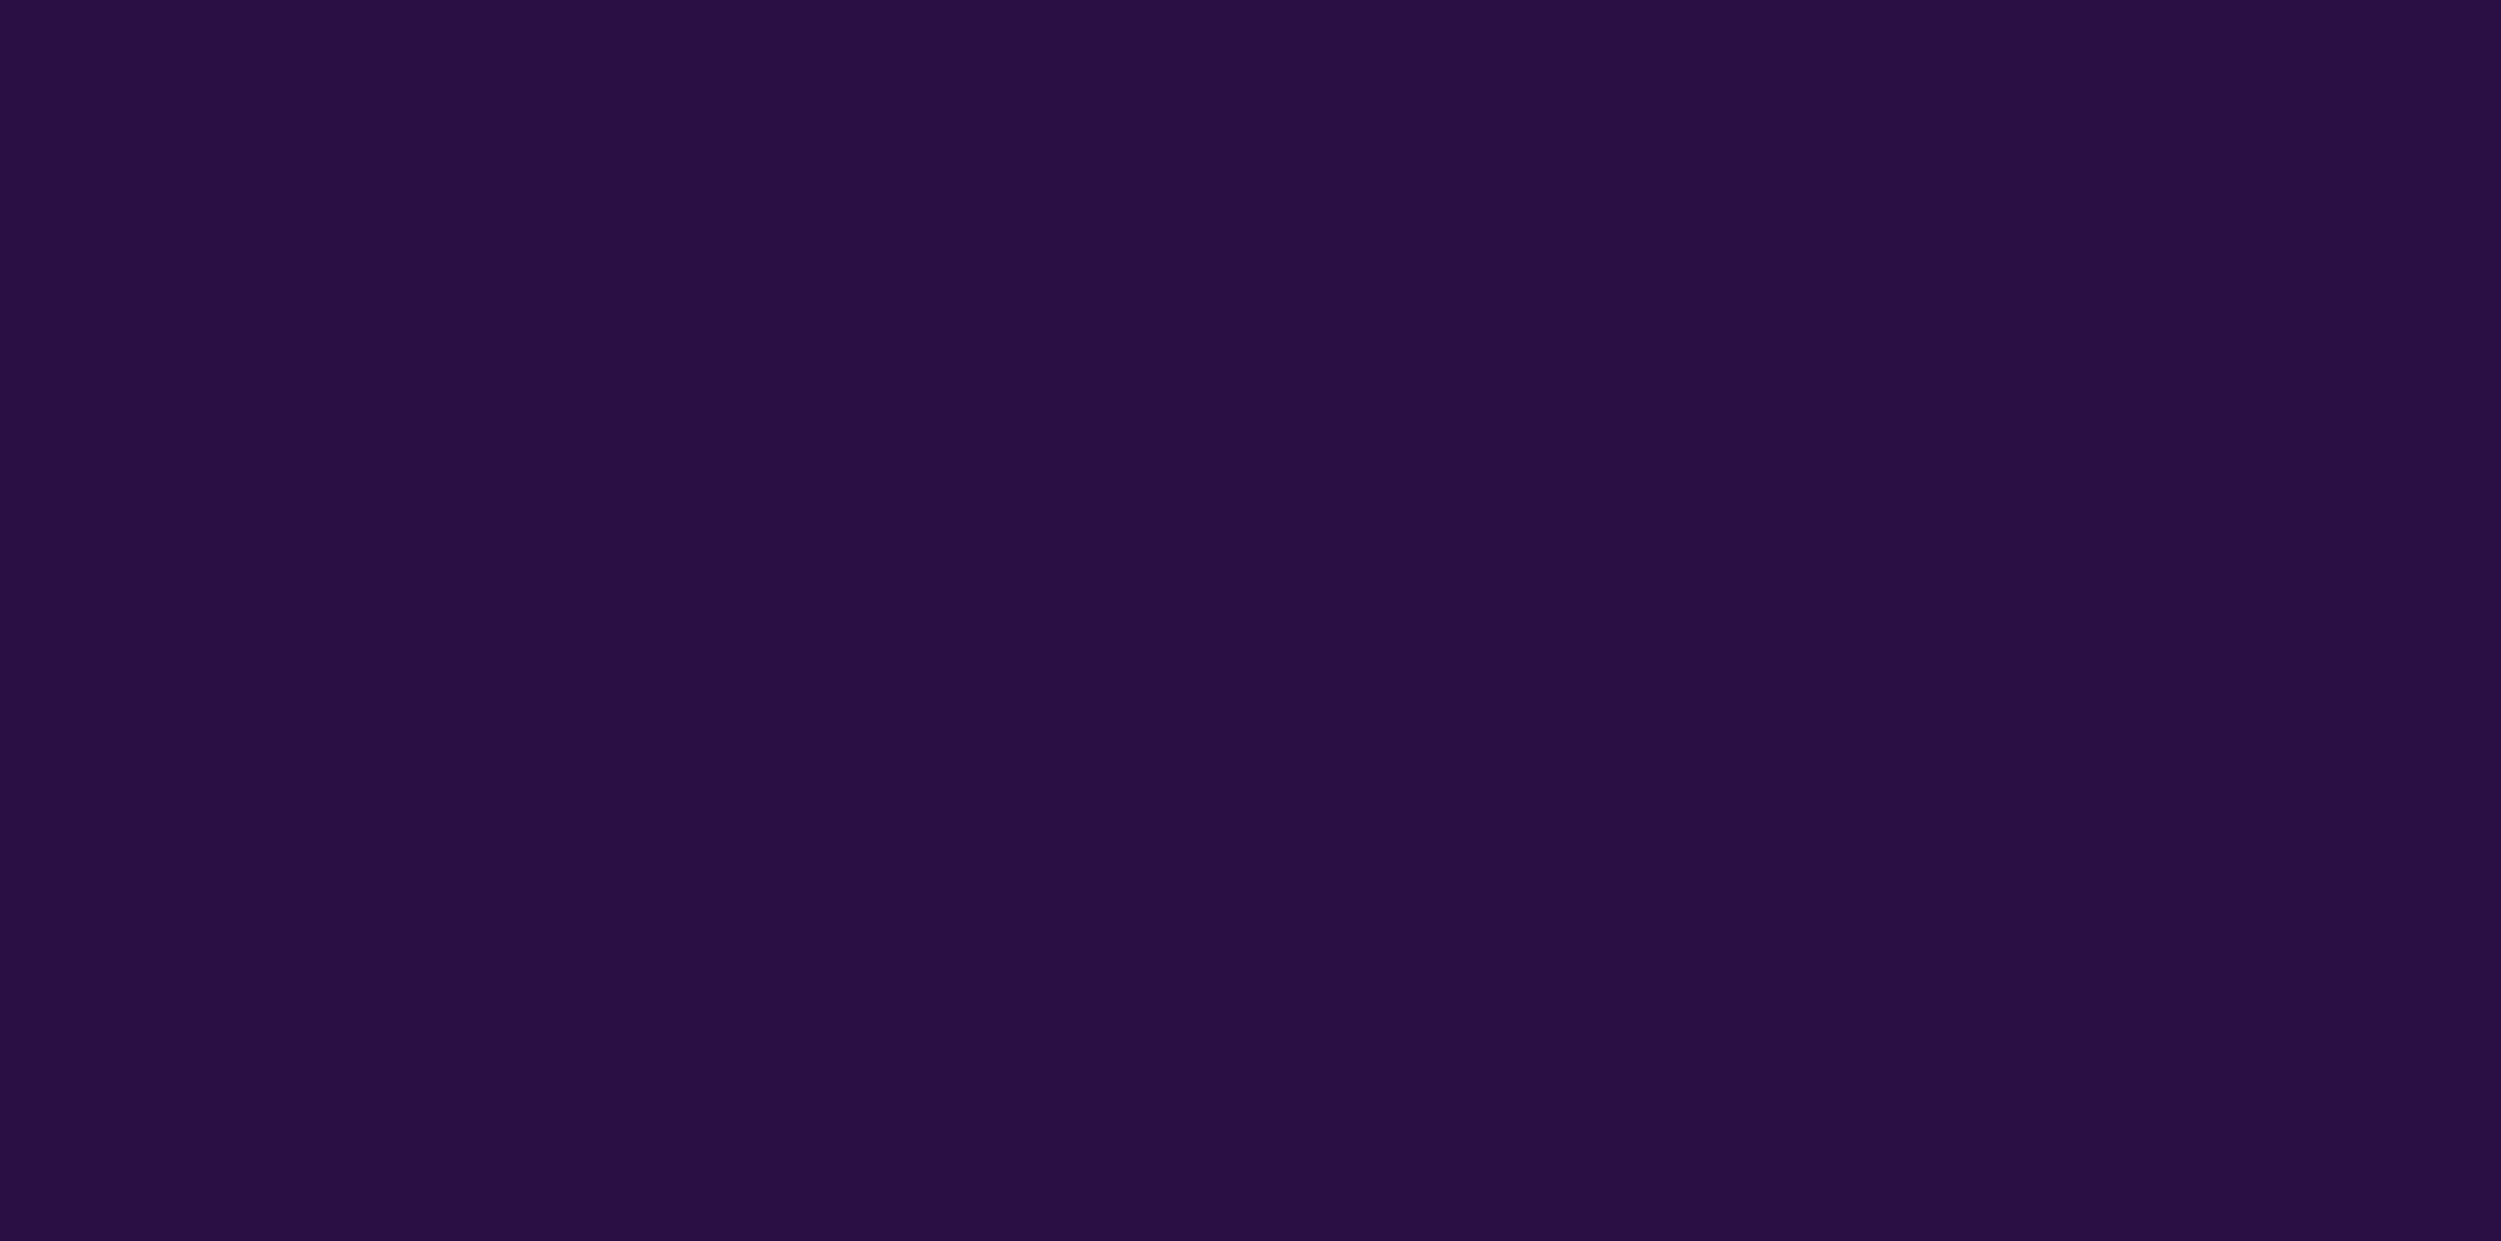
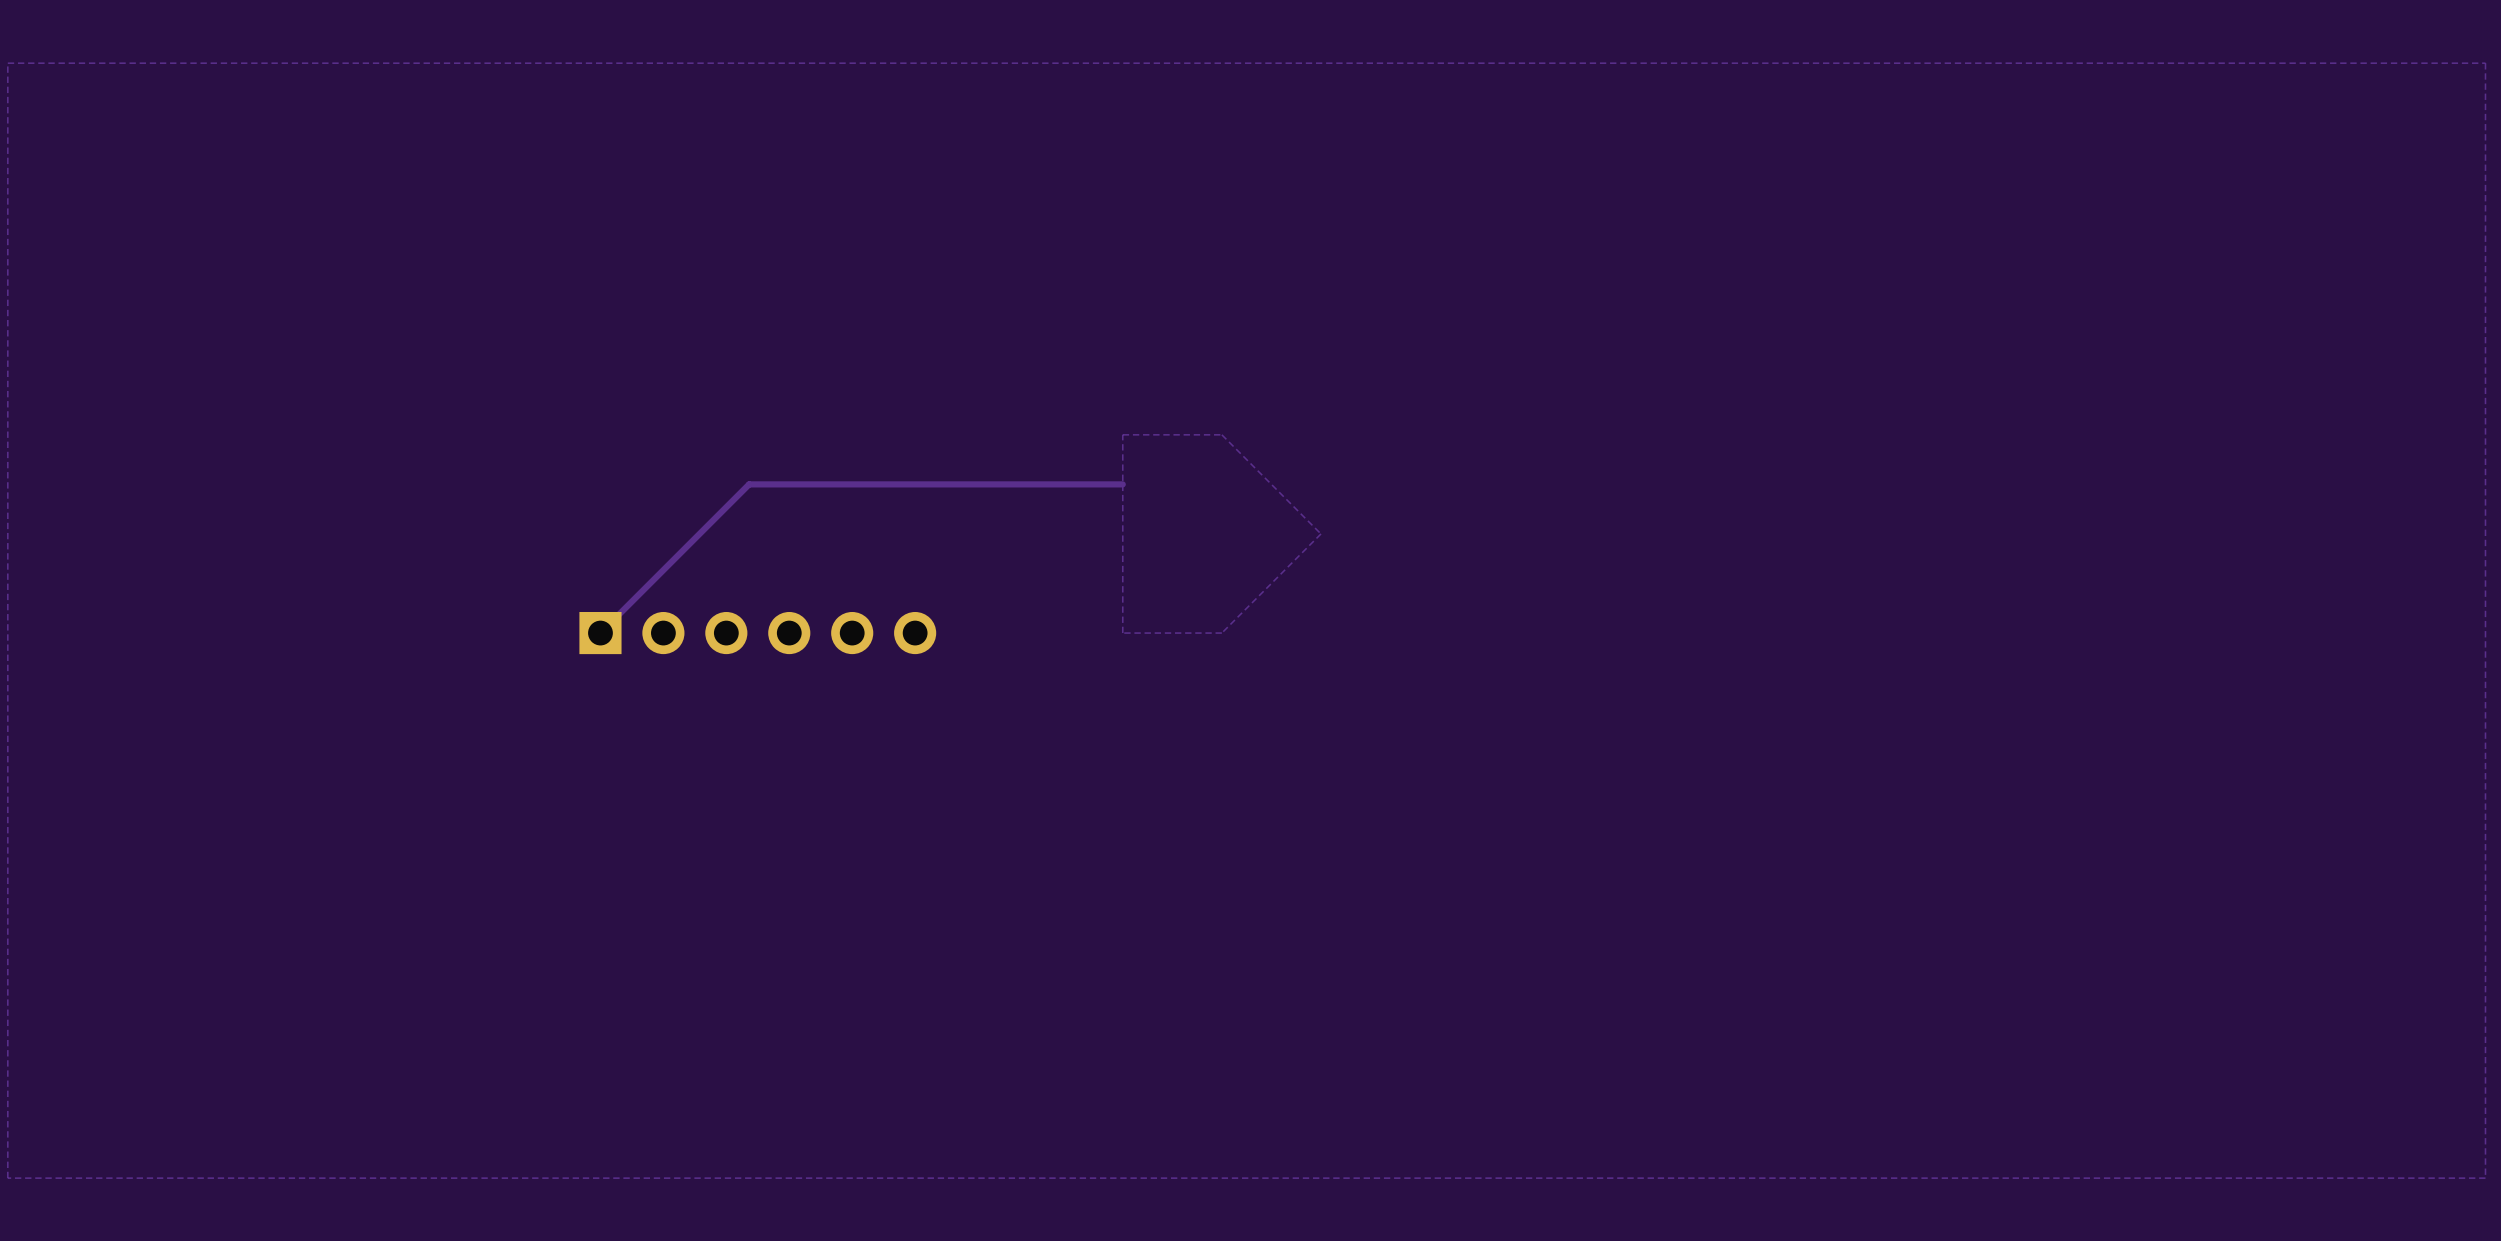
zone outline: none -> (7, 63) (7, 1178) (2485, 1178) (2485, 63) (7, 63)
zone outline: none -> (1122, 434) (1122, 633) (1221, 633) (1320, 533) (1221, 434) (1122, 434)
track: none -> (1122, 484) (749, 484) (600, 633)
part: none -> (757, 633)

